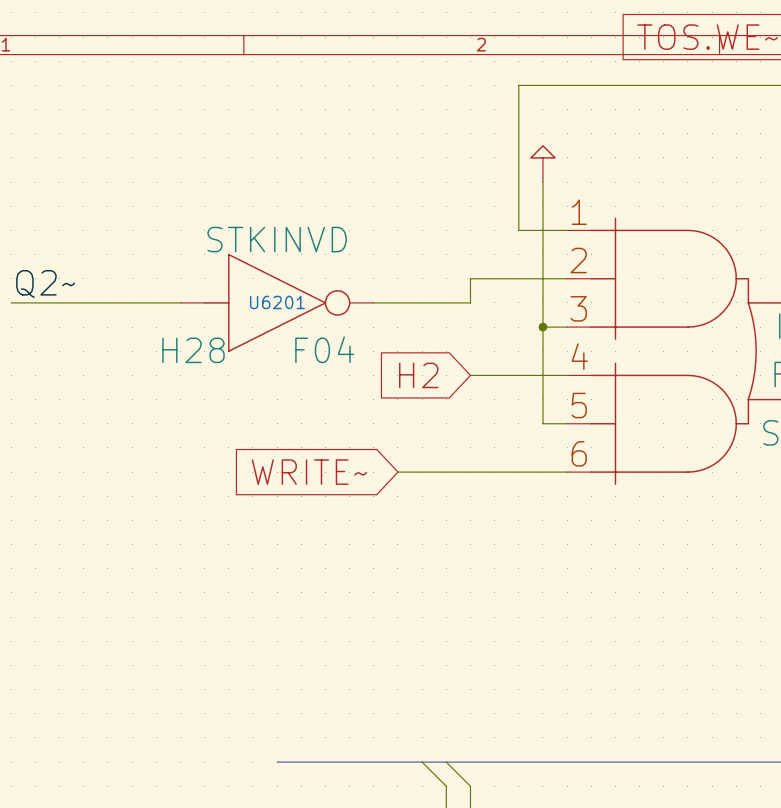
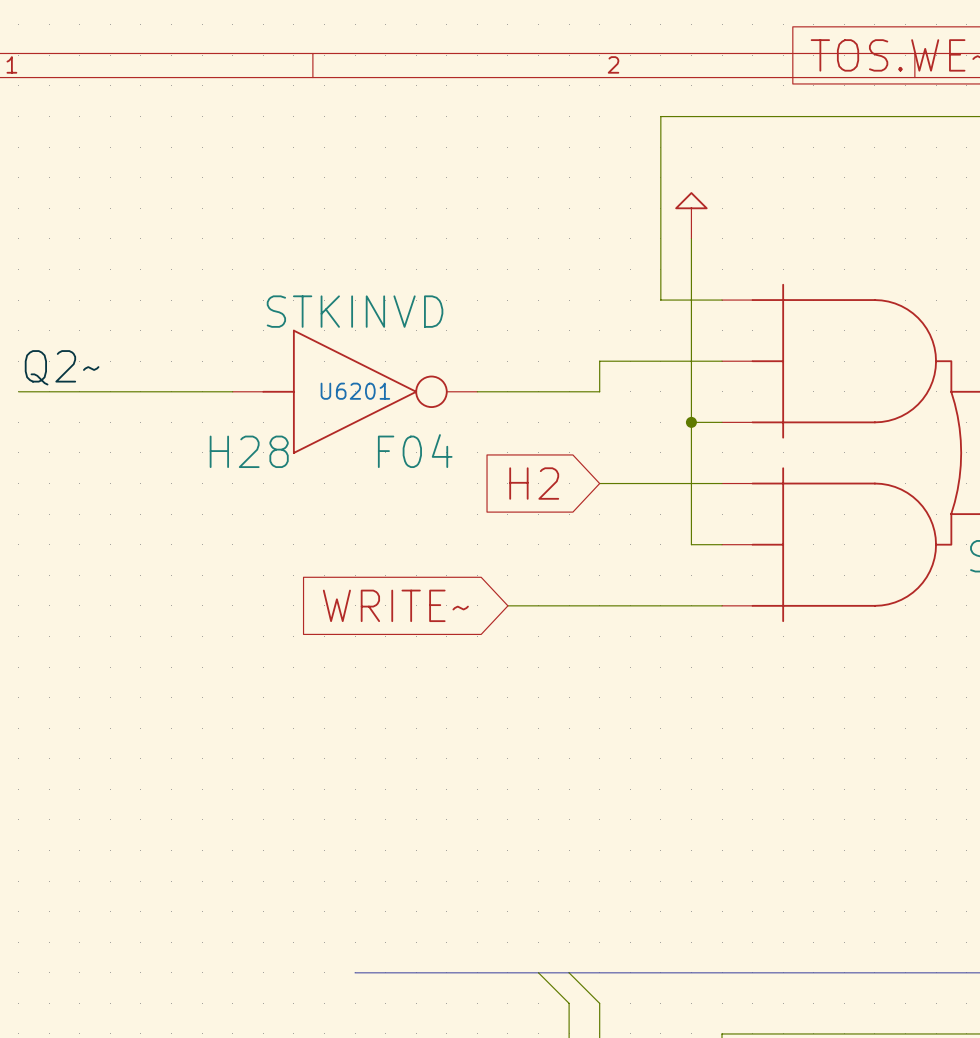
part pin number: 1 (579, 212) -> none
part pin number: 2 (578, 260) -> none
part pin number: 3 (578, 308) -> none
part pin number: 4 (579, 356) -> none
part pin number: 5 (579, 405) -> none
part pin number: 6 (579, 453) -> none

